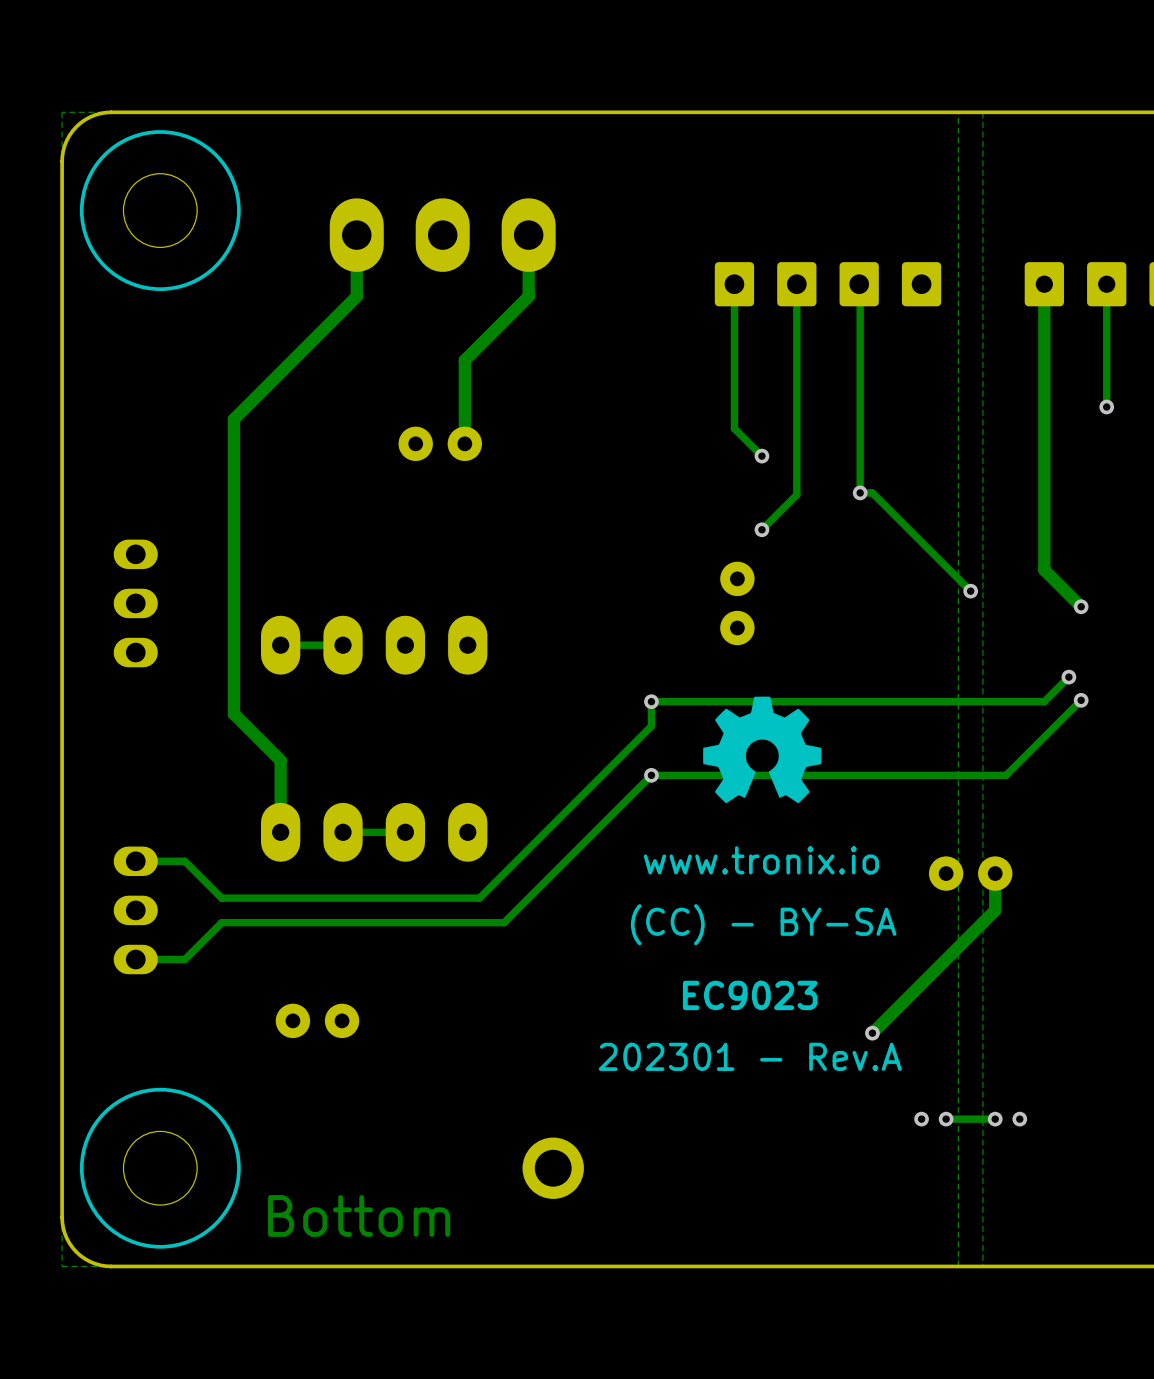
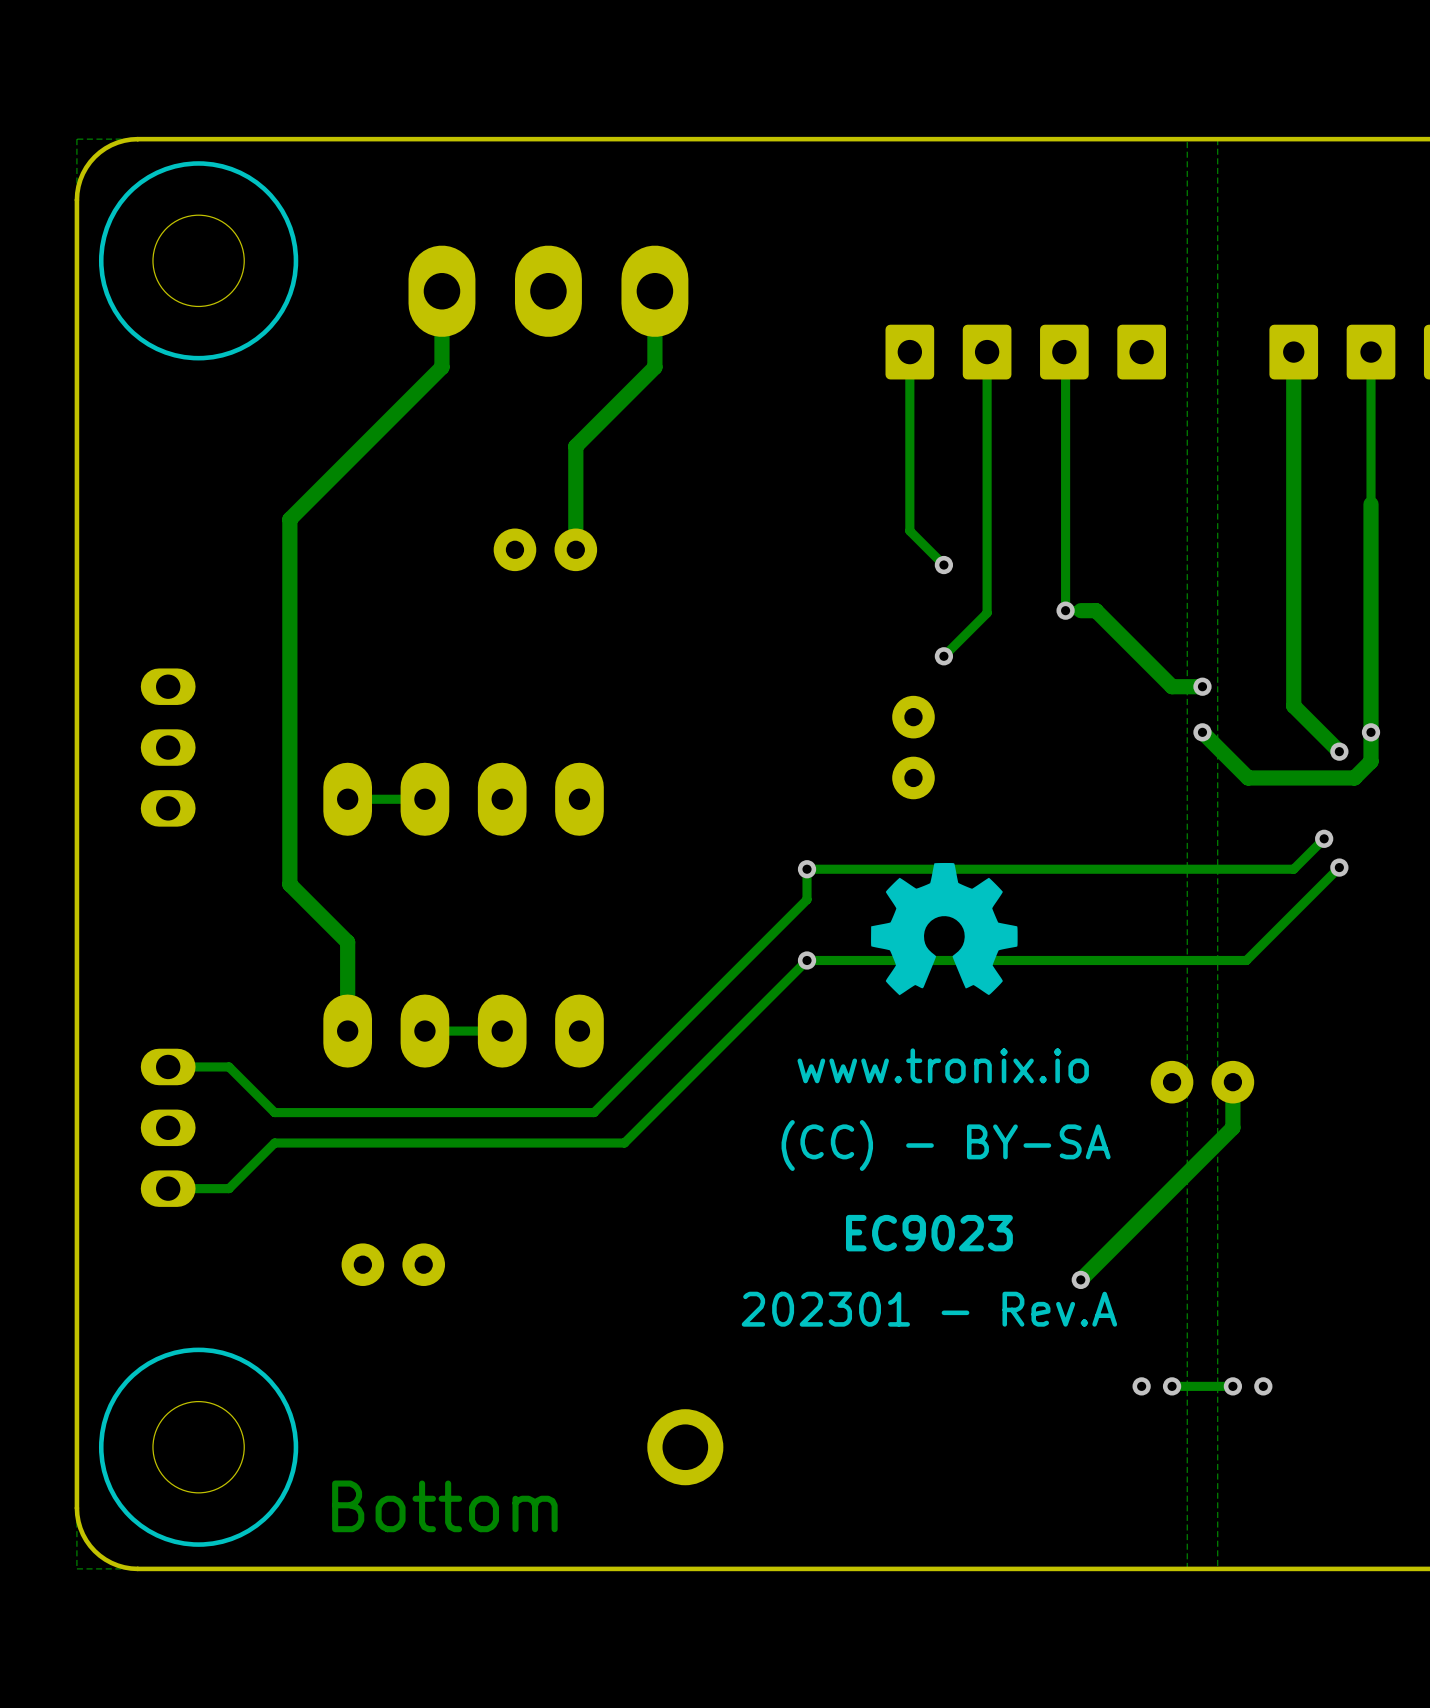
track: none -> (1371, 504) (1371, 761) (1354, 777) (1248, 777) (1202, 732)
via: (1106, 406) -> none
track: (872, 492) (970, 591) -> (1080, 610) (1096, 610) (1172, 686) (1202, 686)
via: none -> (1202, 686)
via: none -> (1371, 732)

